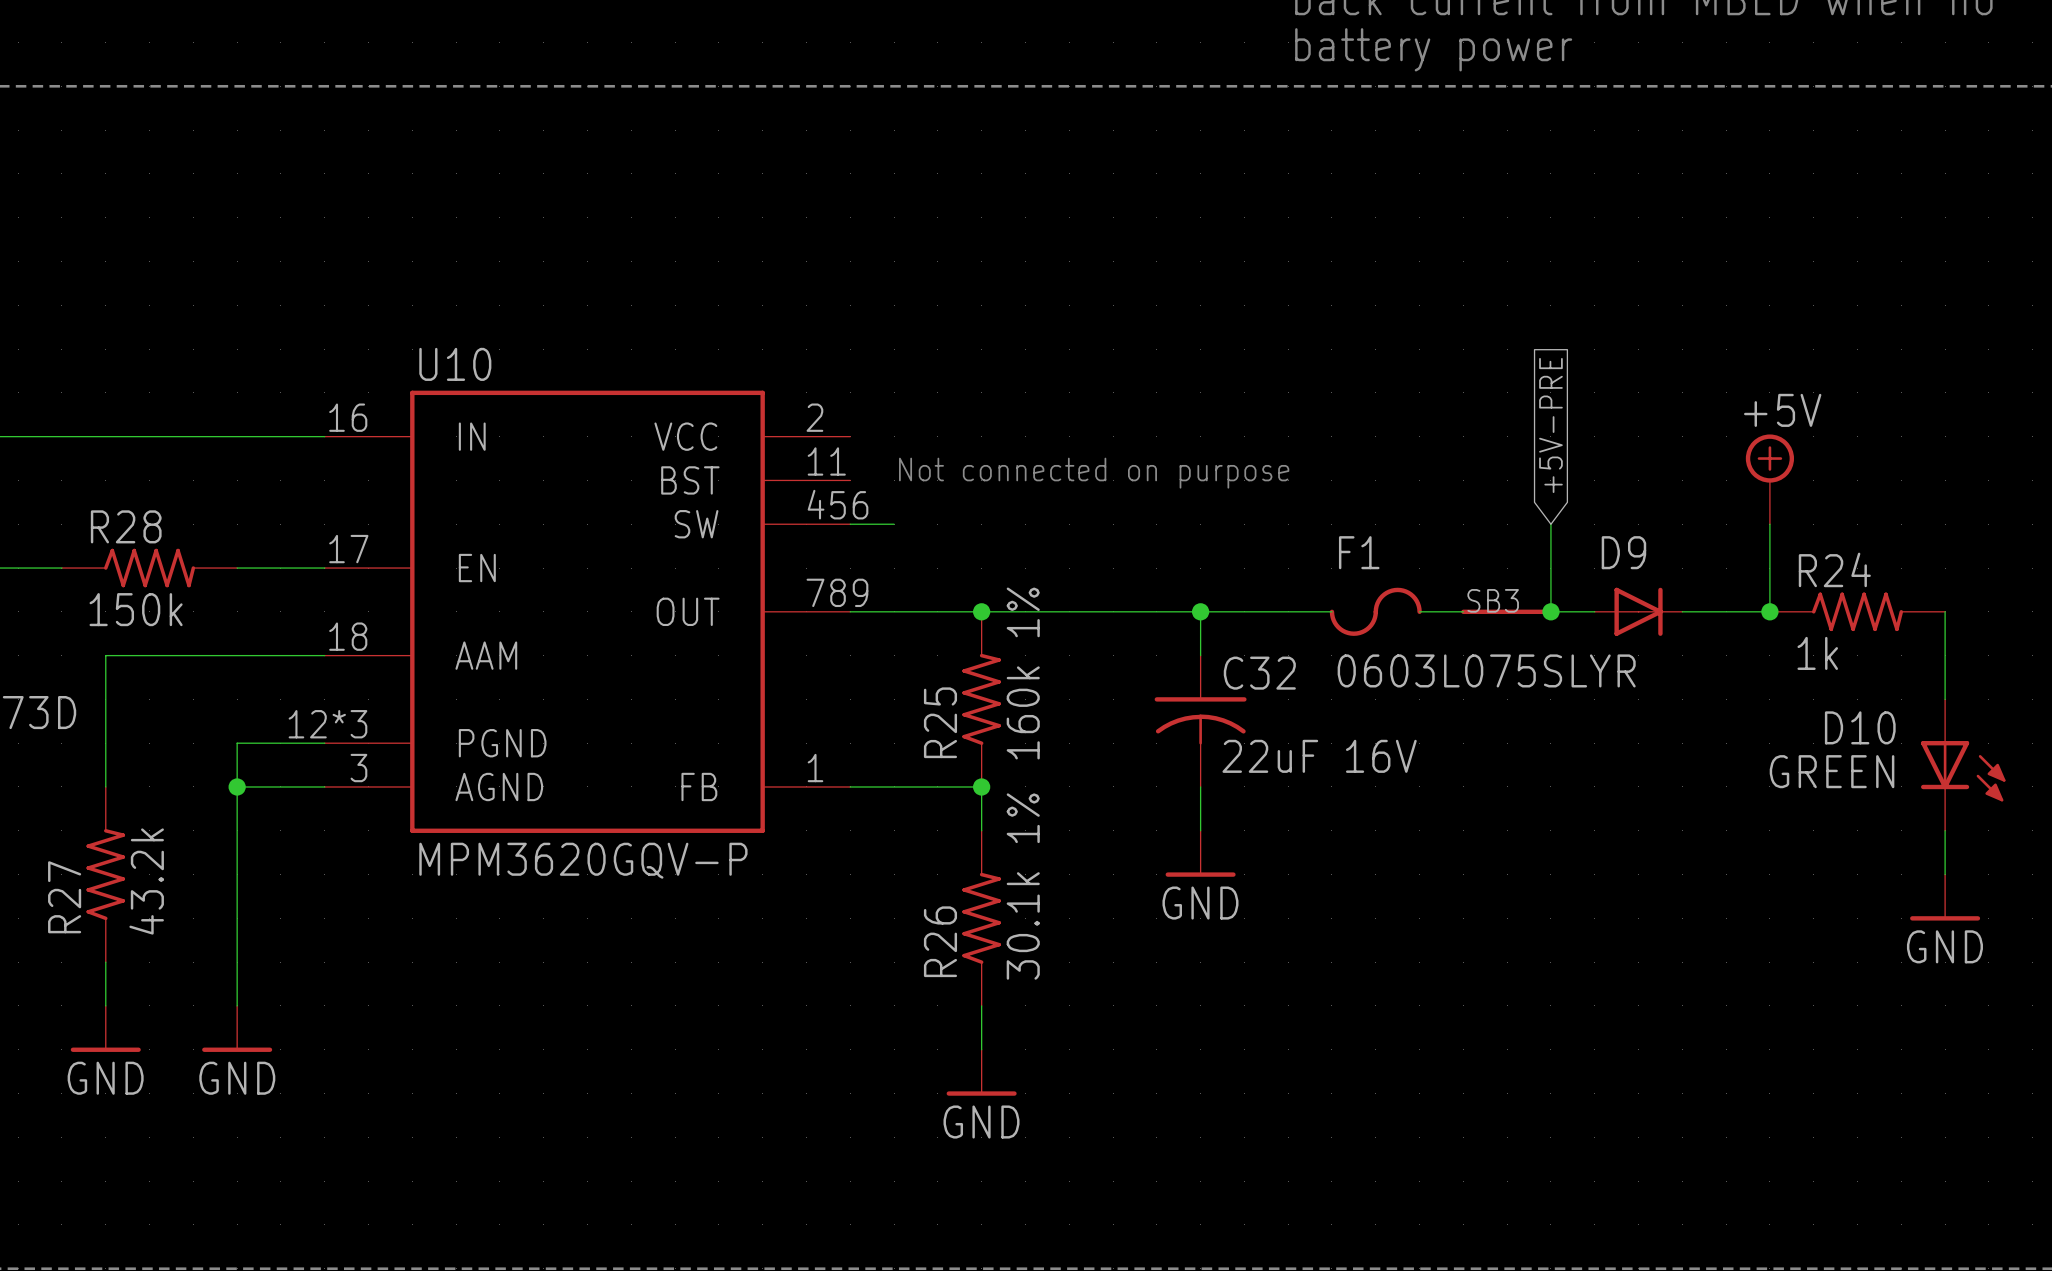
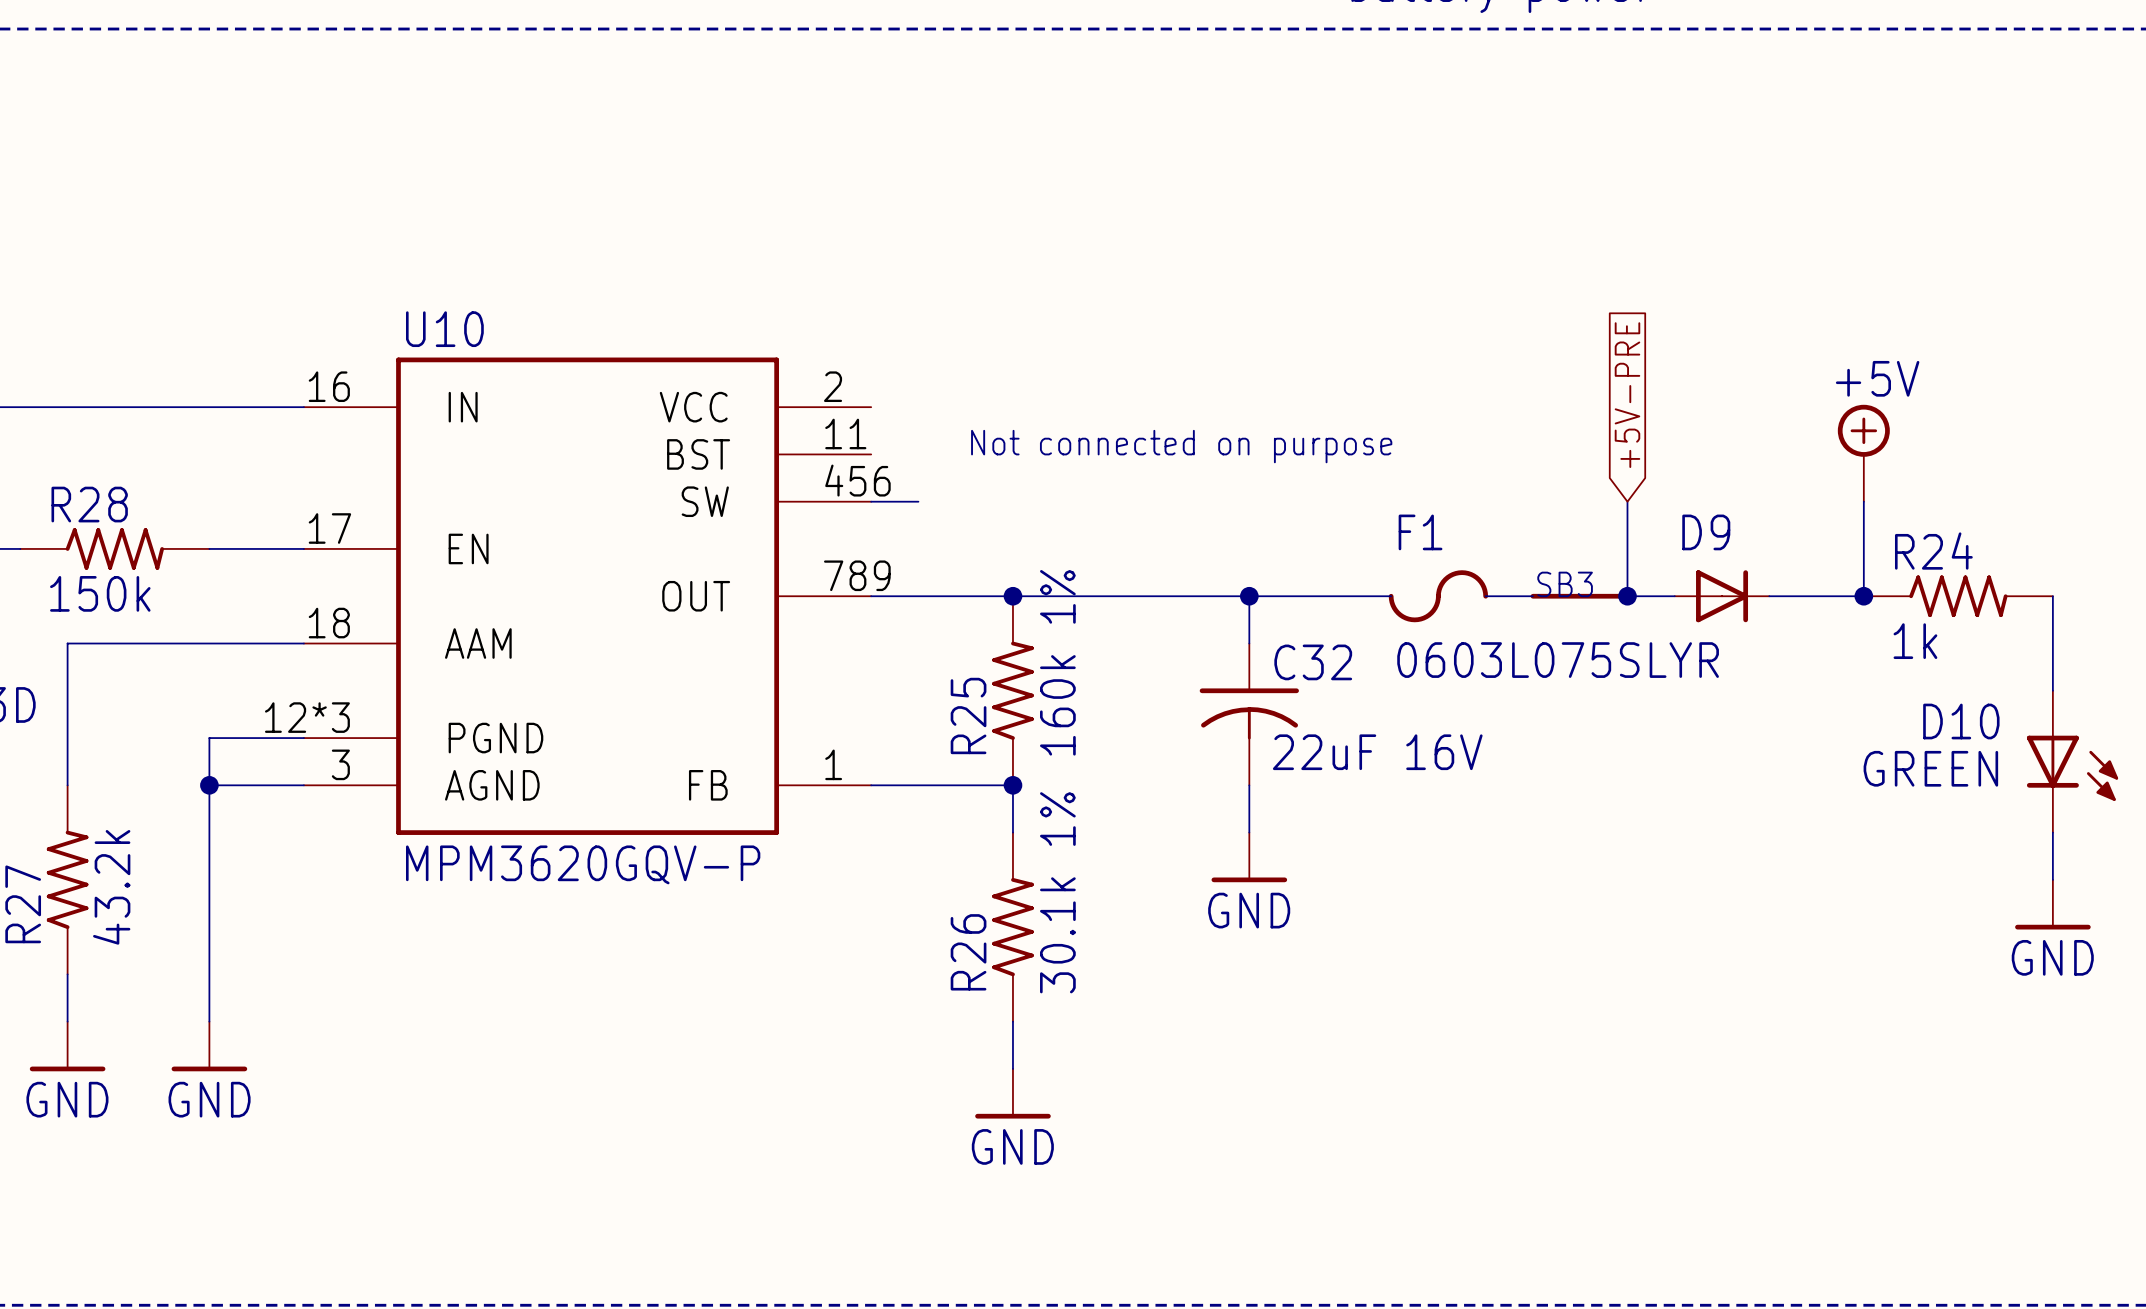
text position: Not connected on purpose (1094, 473) -> Not connected on purpose (1181, 446)

